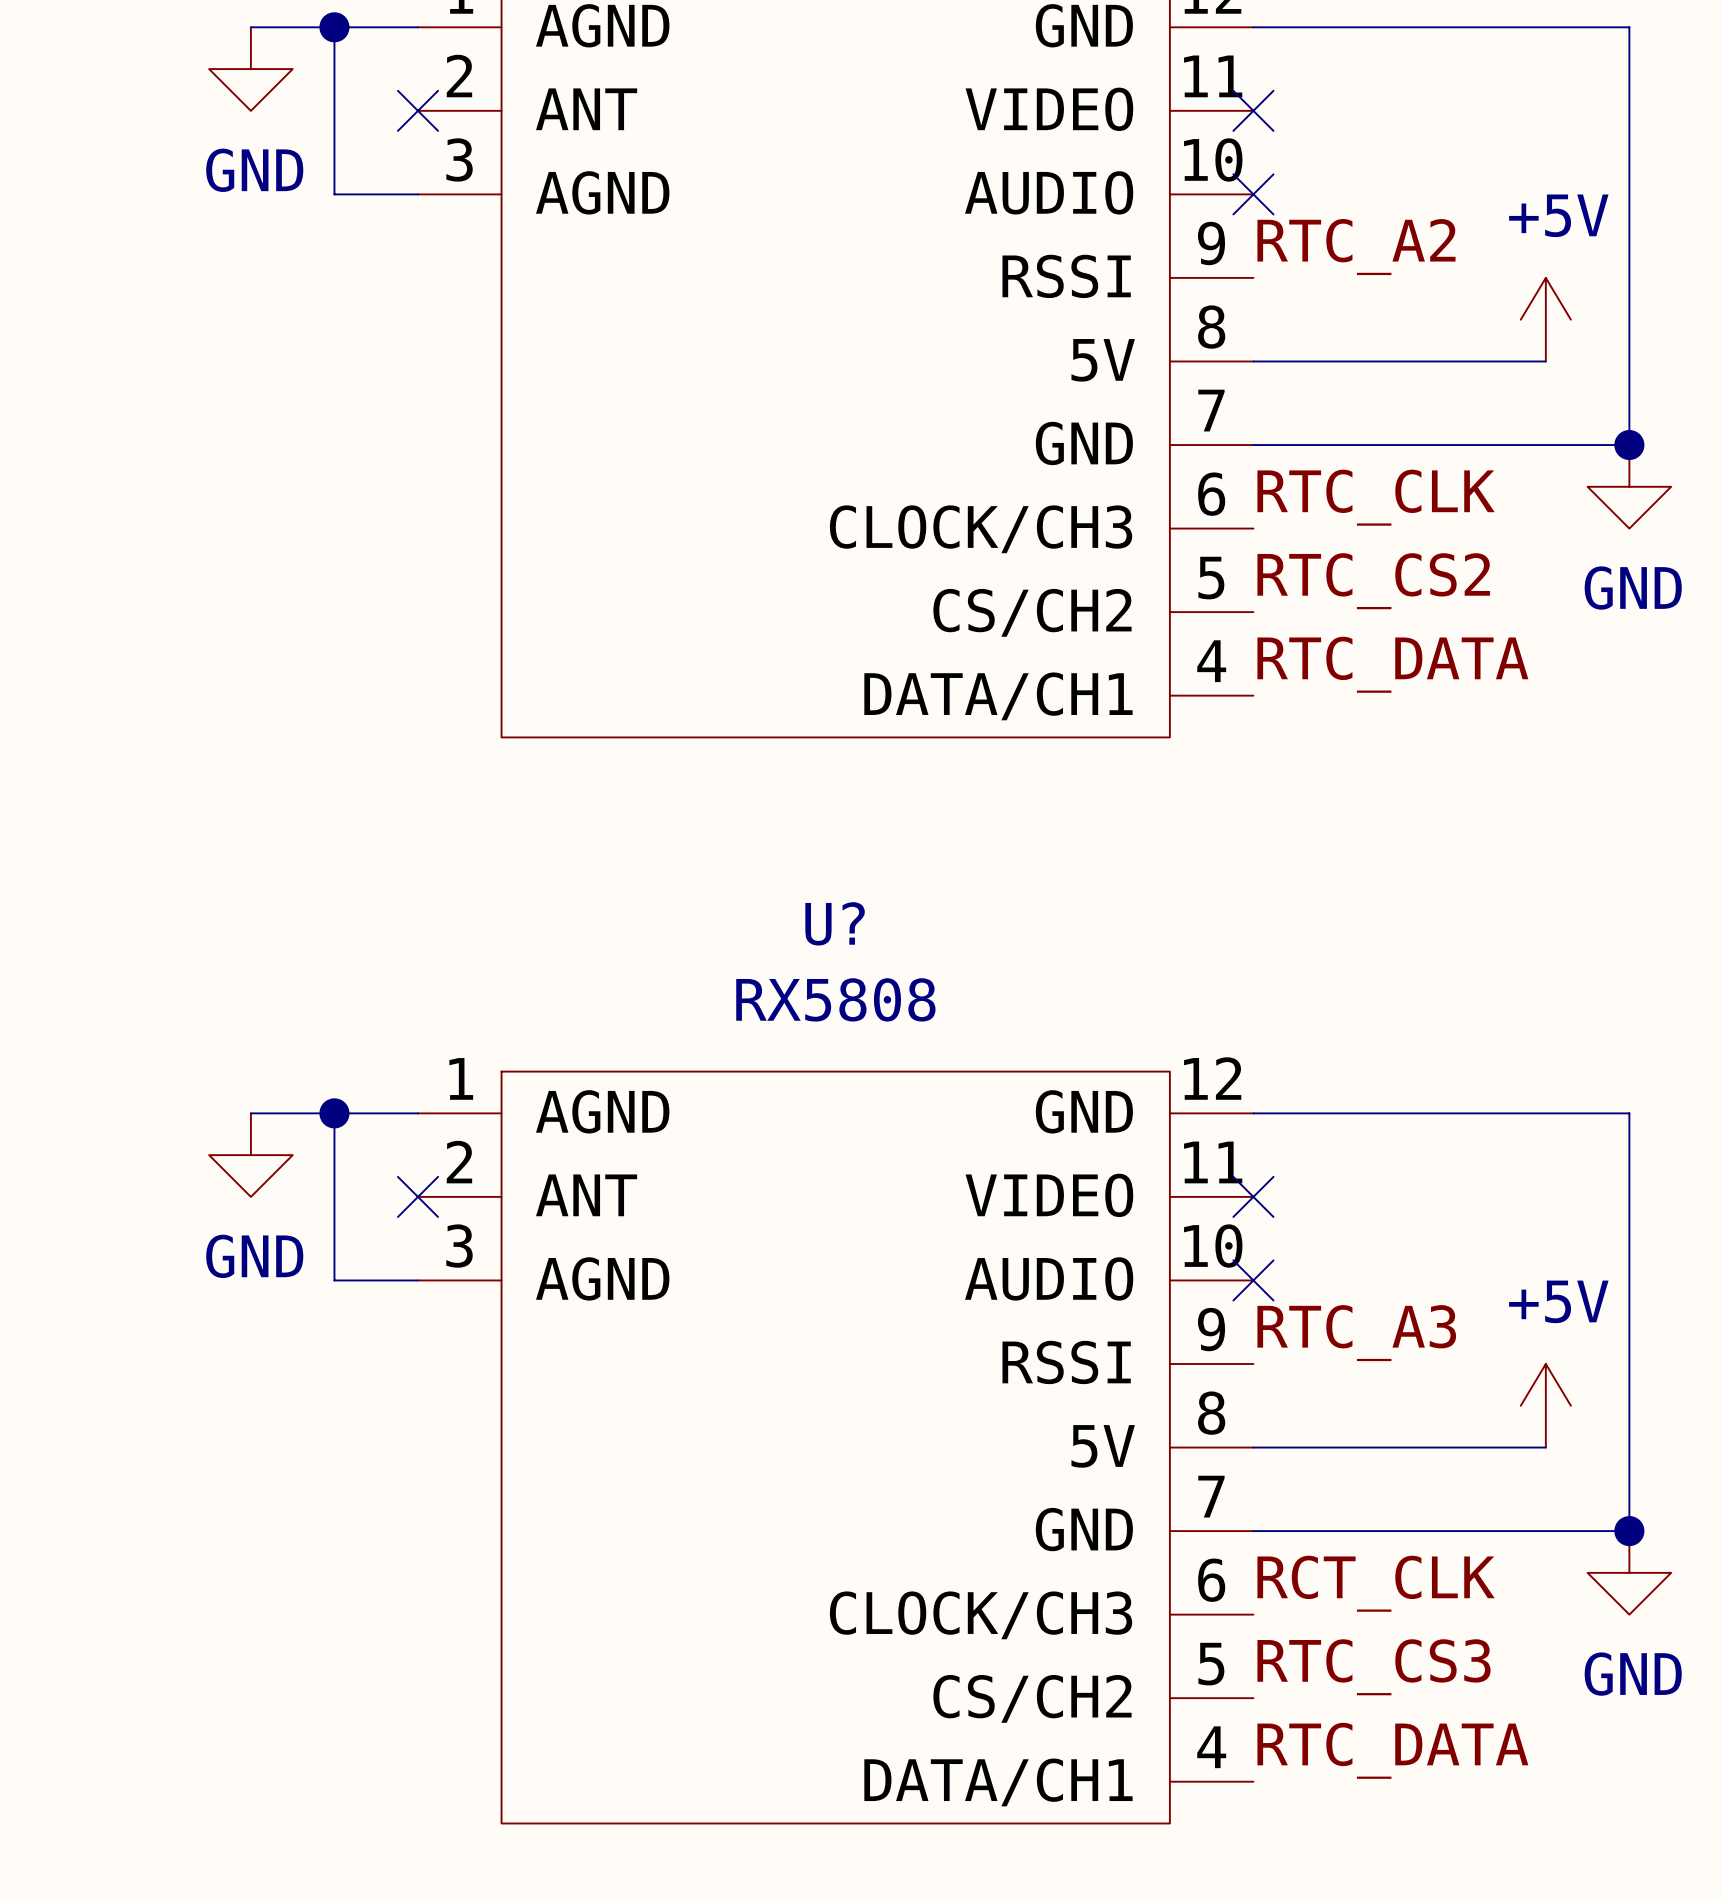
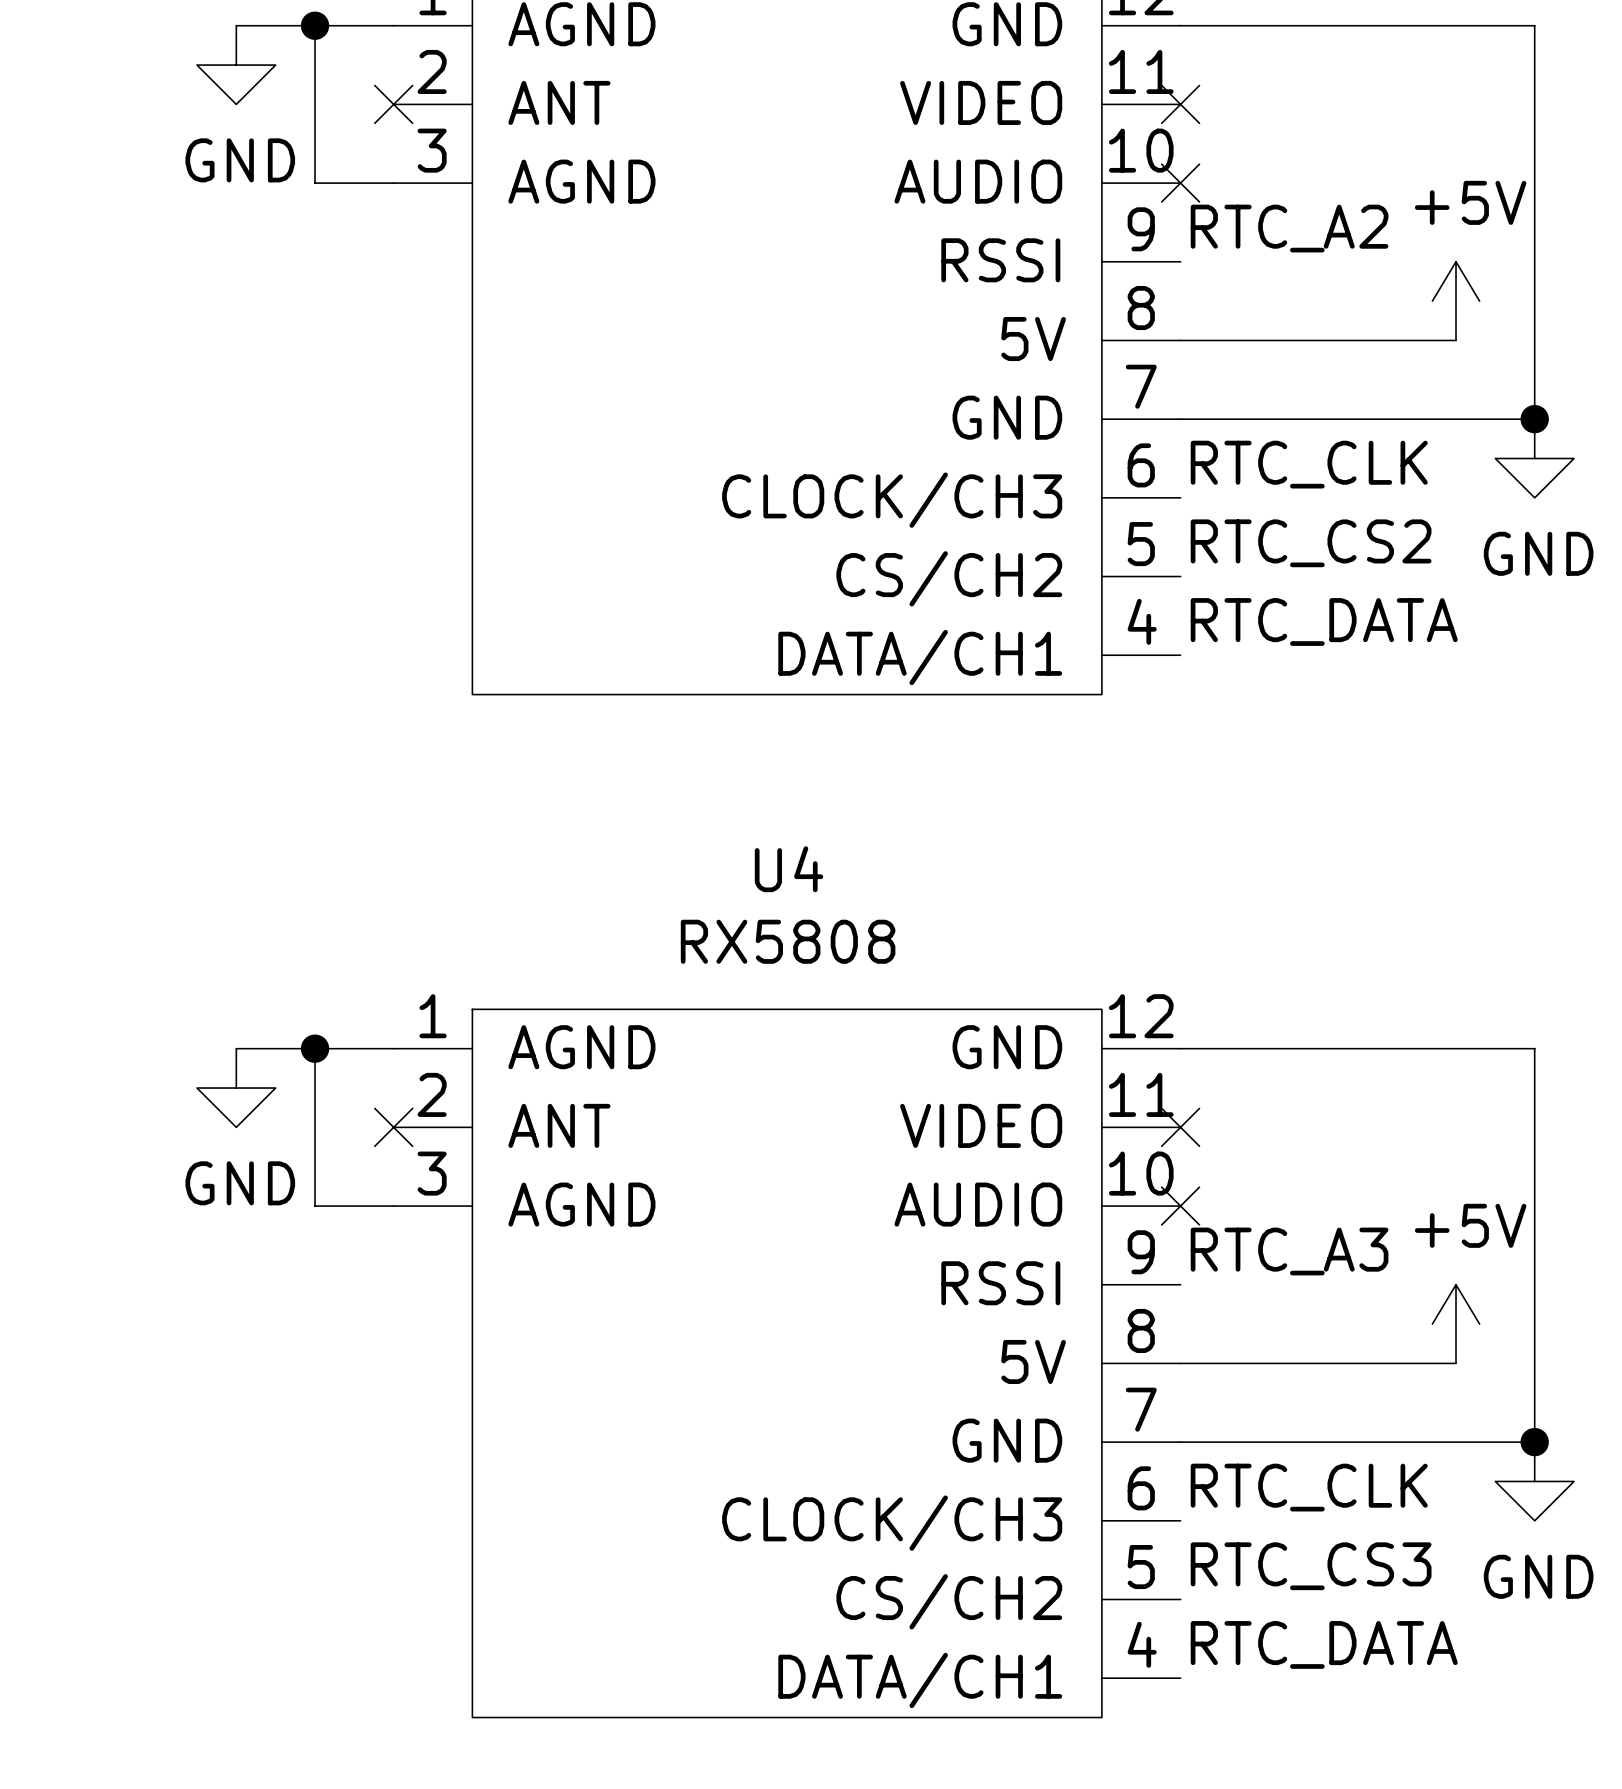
U? name: U? (835, 923) -> U4 (789, 869)
label: RCT_CLK (1376, 1583) -> RTC_CLK (1309, 1487)

